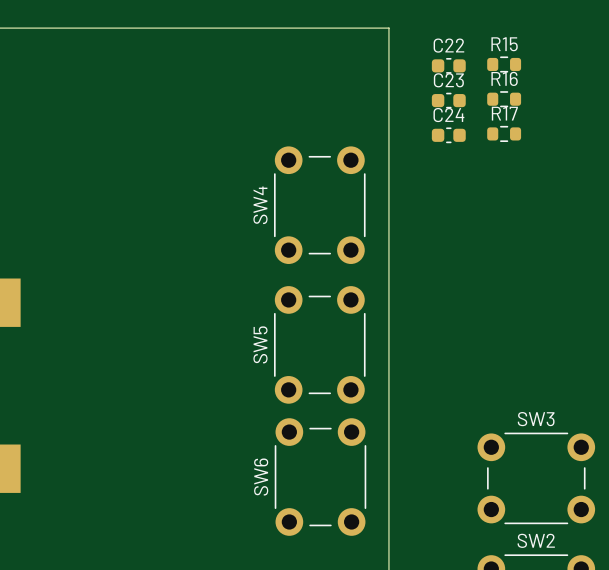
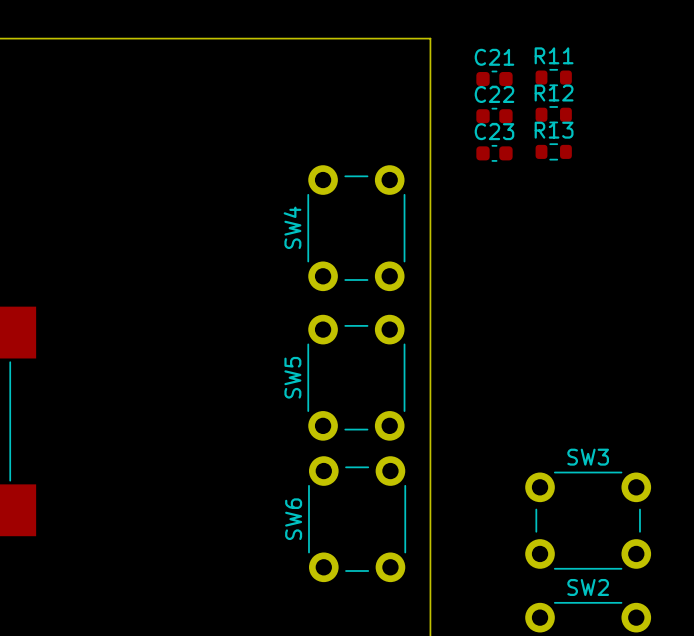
R15 name: R15 (504, 44) -> R11 (554, 55)
C22 name: C22 (448, 45) -> C21 (494, 57)
R16 name: R16 (504, 78) -> R12 (554, 92)
C23 name: C23 (448, 80) -> C22 (494, 94)
R17 name: R17 (504, 113) -> R13 (554, 130)
C24 name: C24 (448, 115) -> C23 (494, 131)

